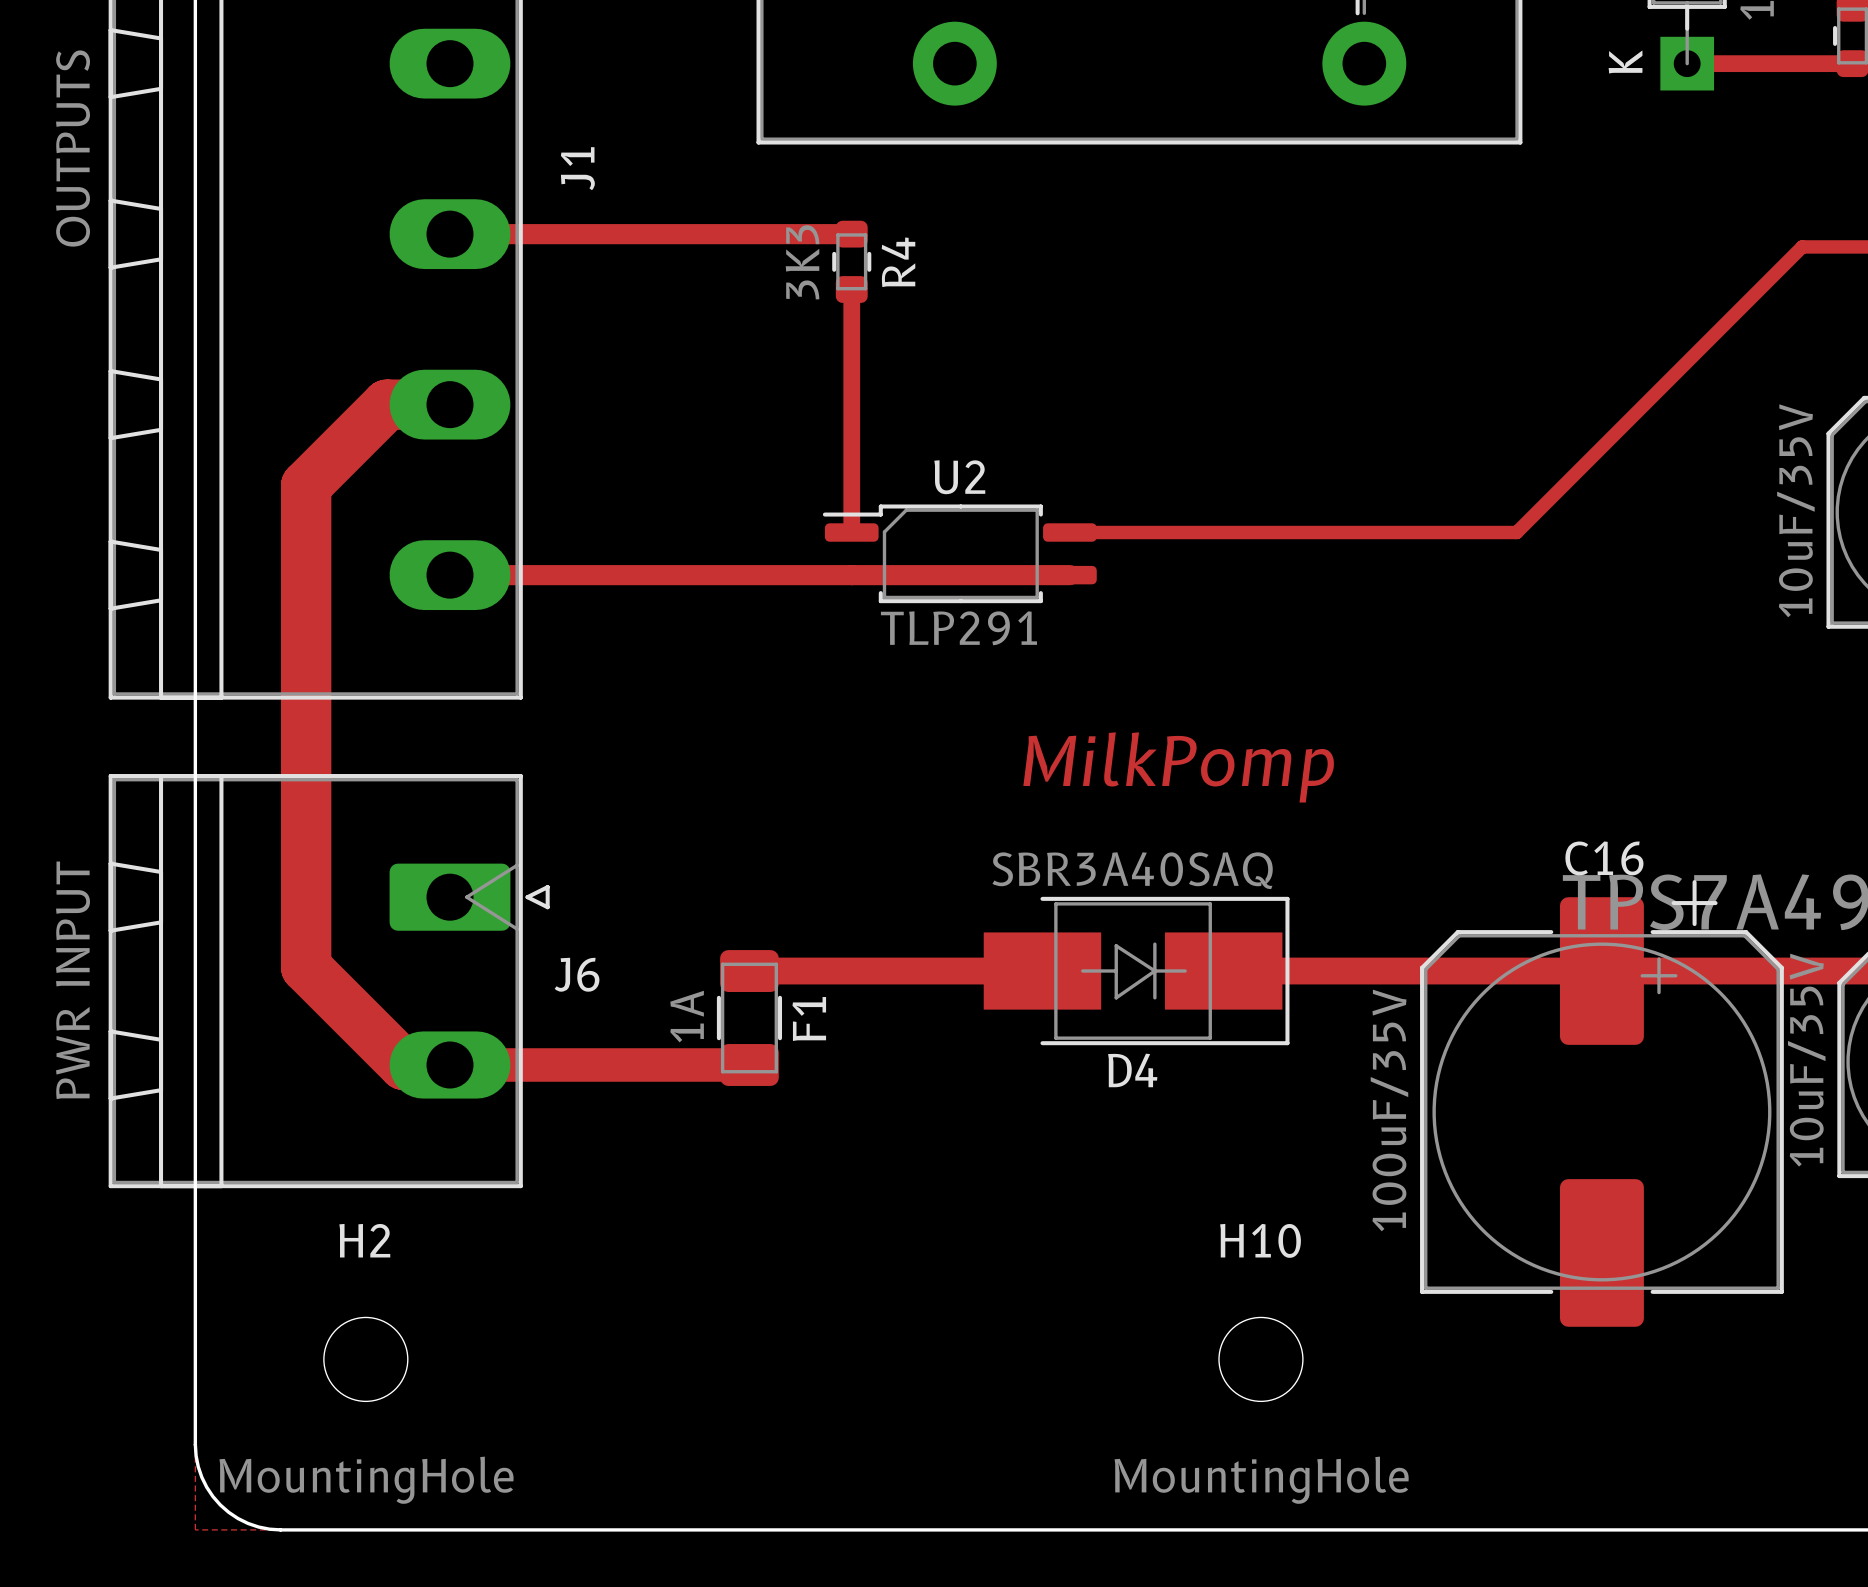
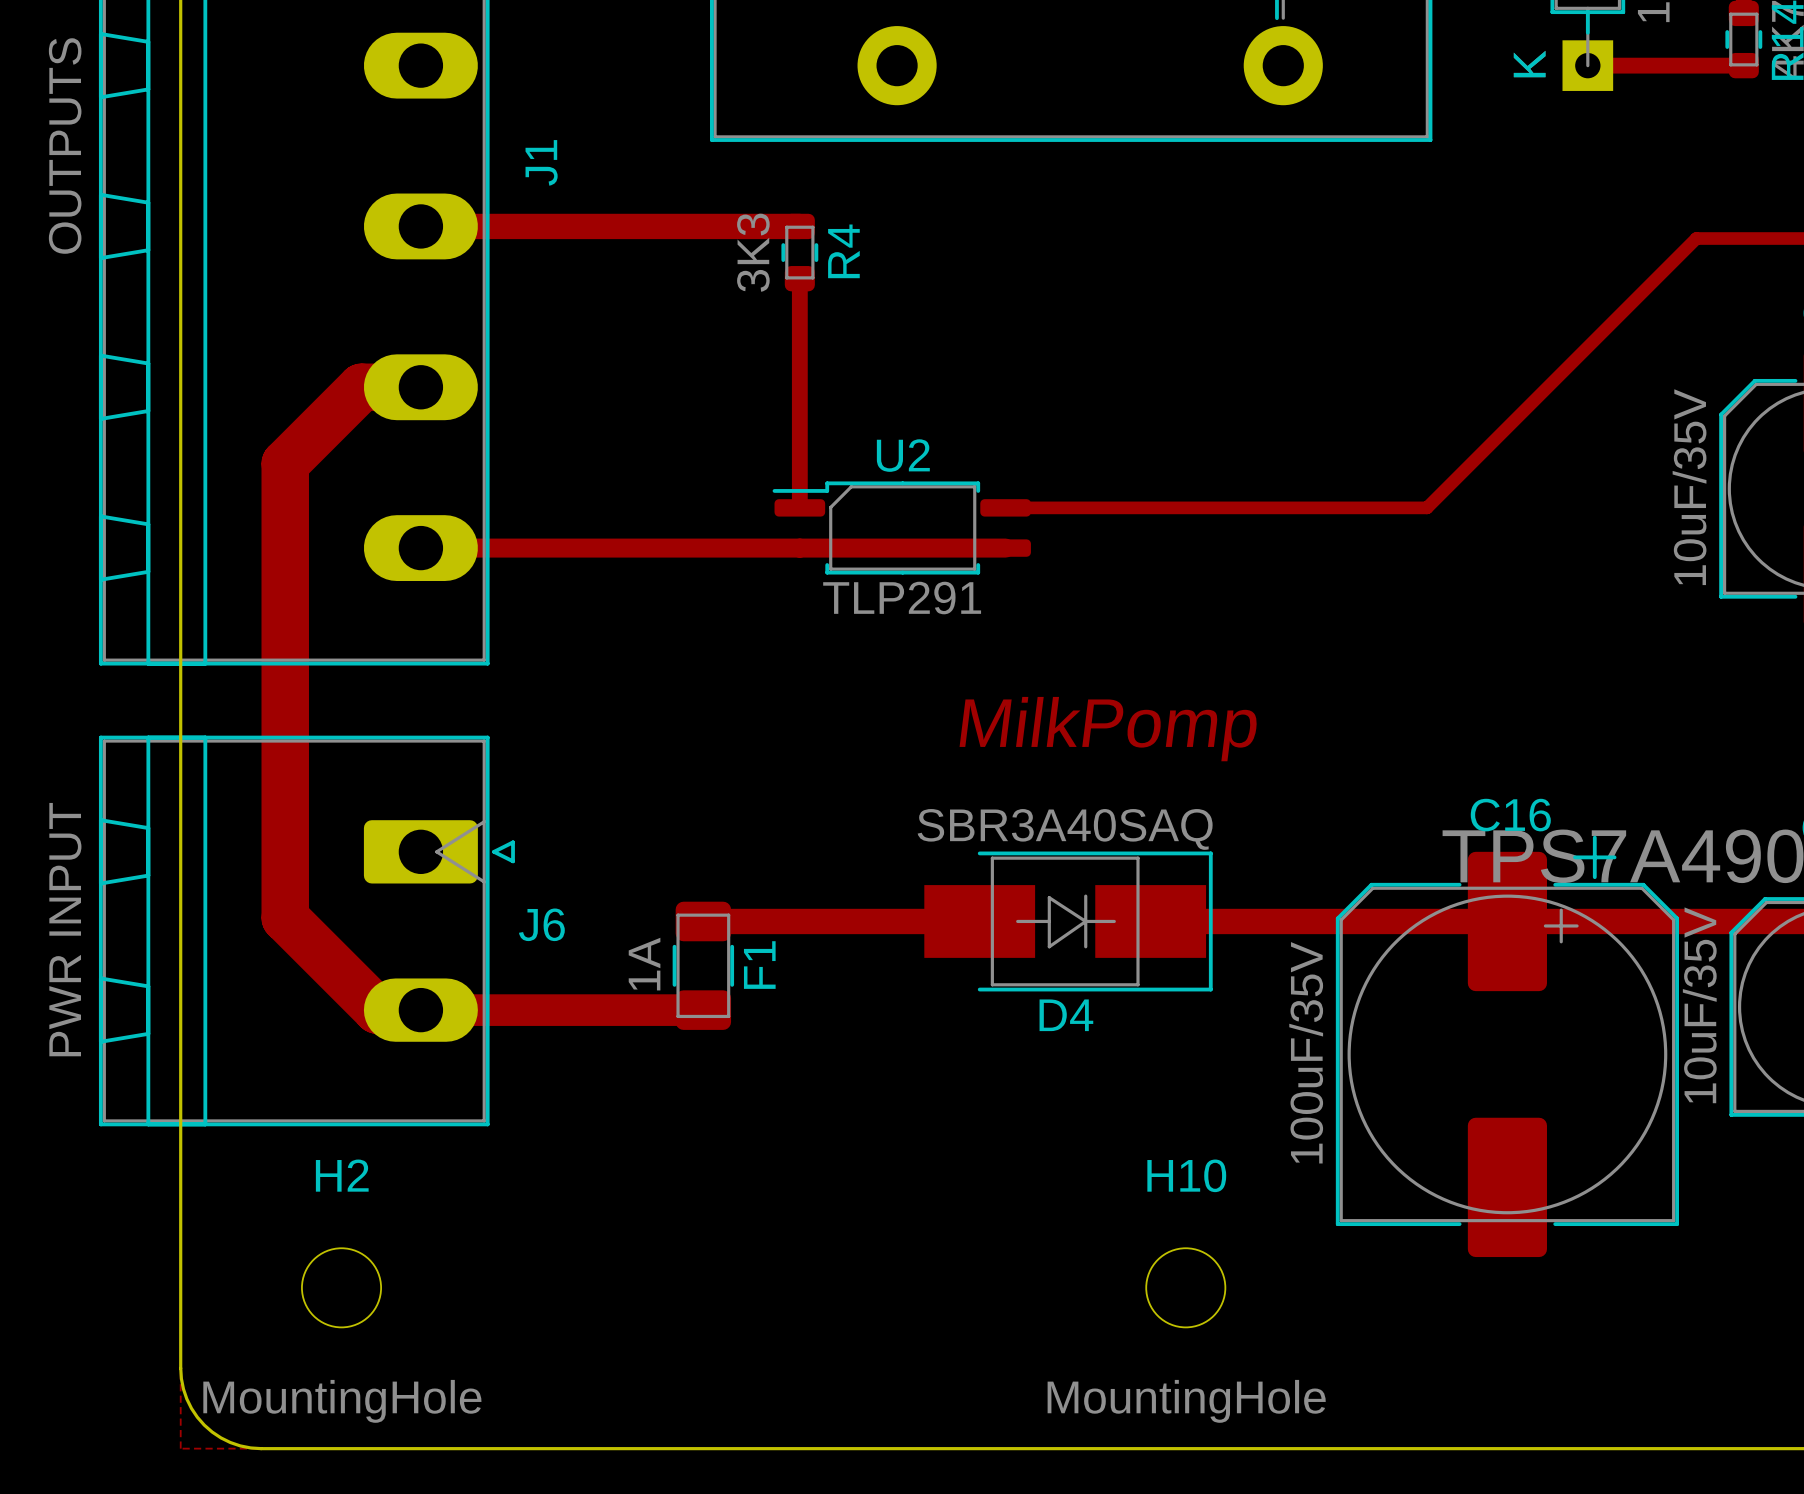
track width: thin (450, 234) (851, 234) -> thick (420, 226) (799, 226)

